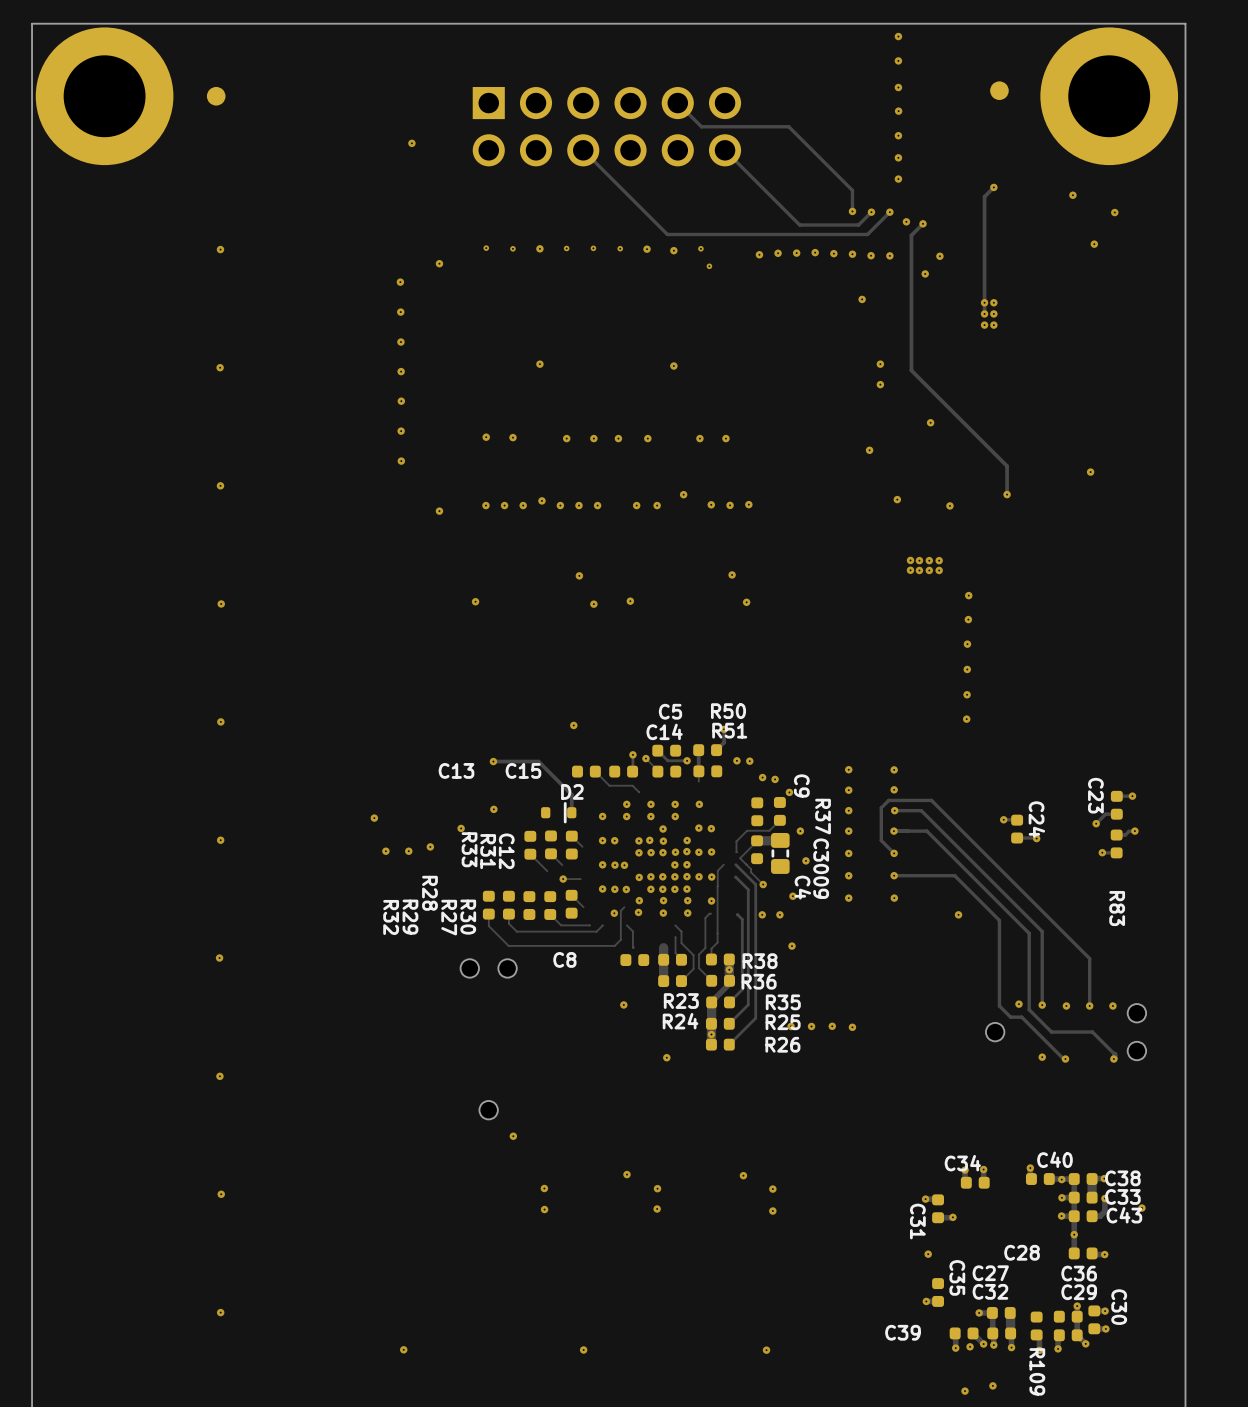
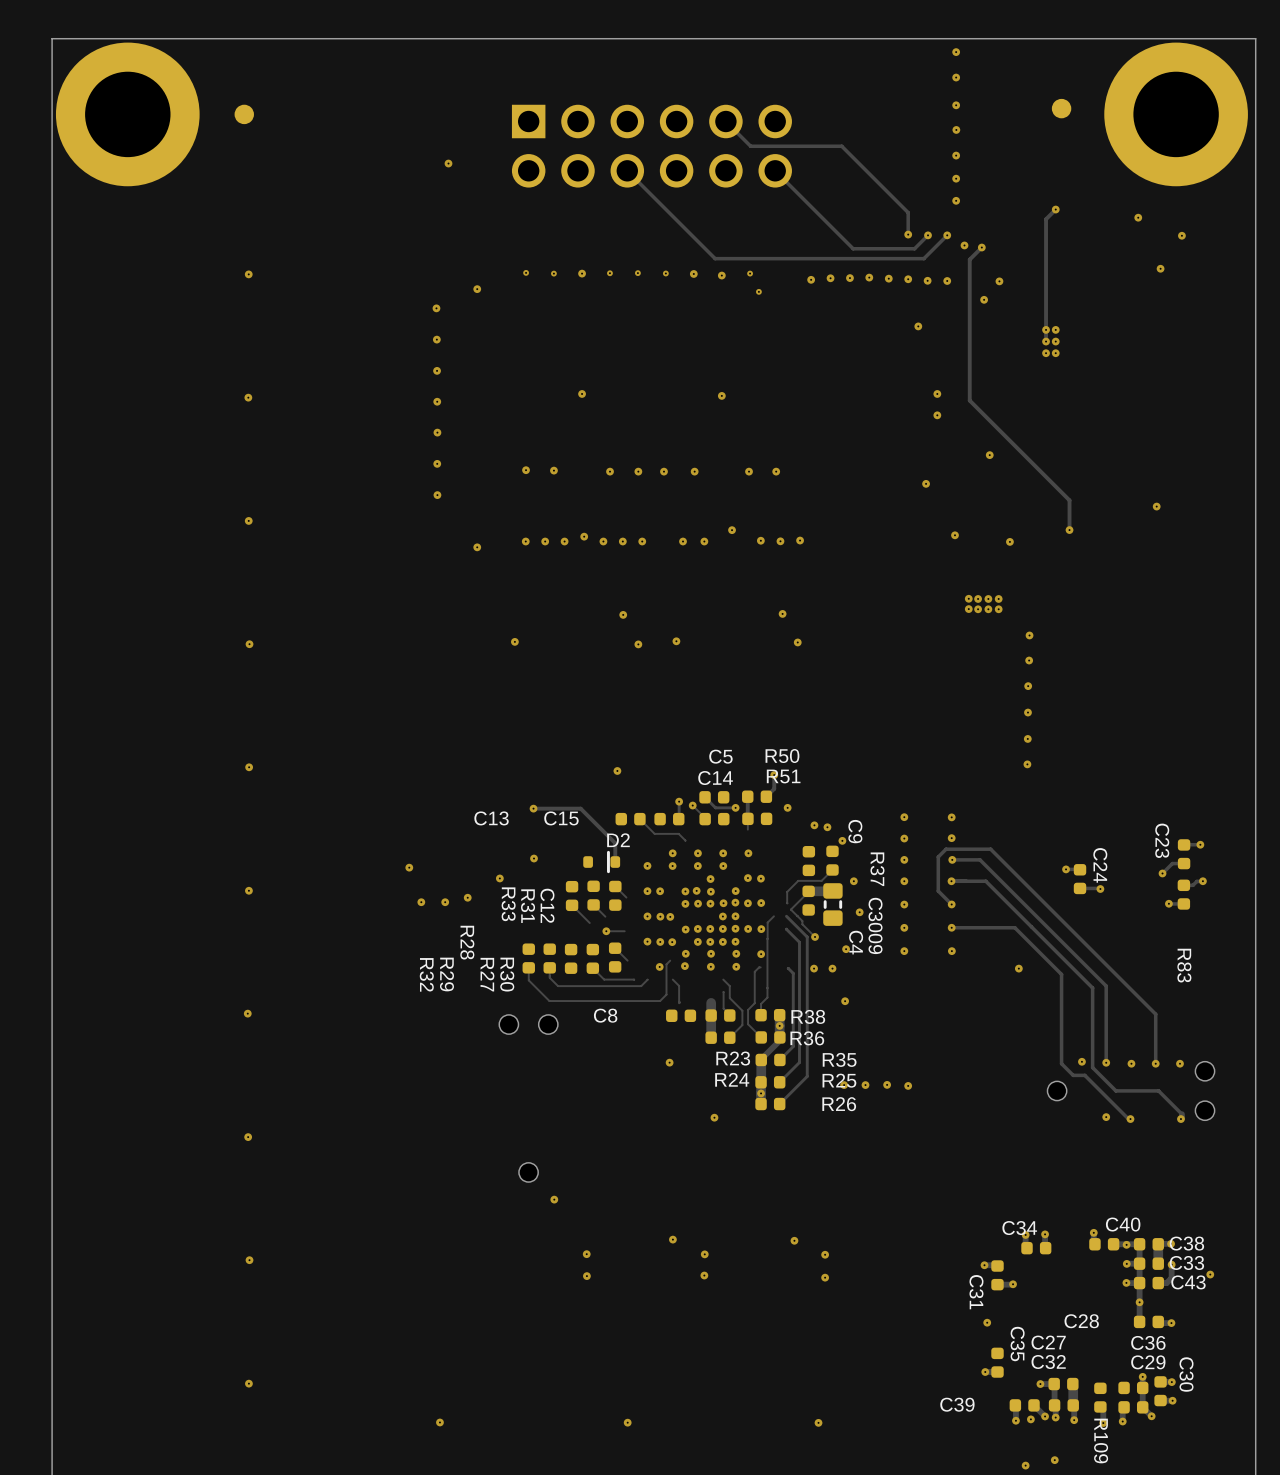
via: (749, 761) -> none

